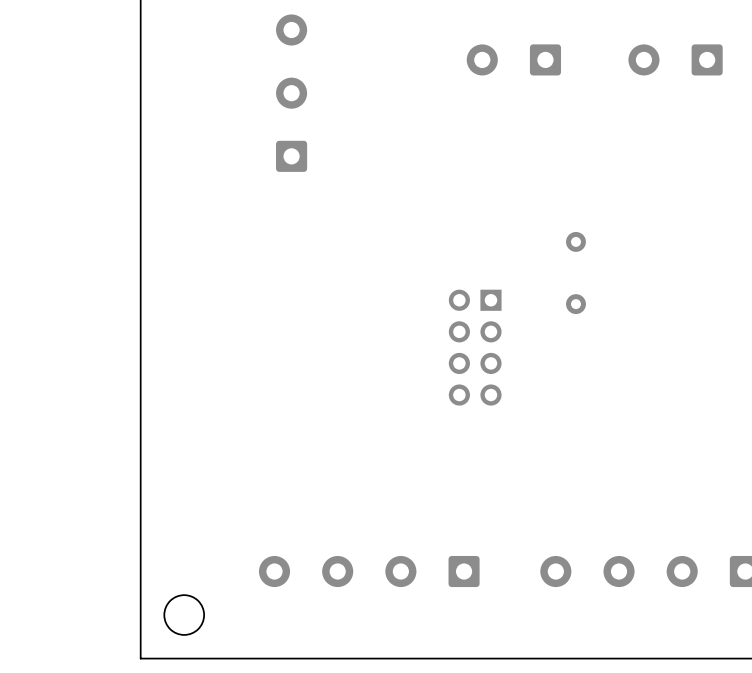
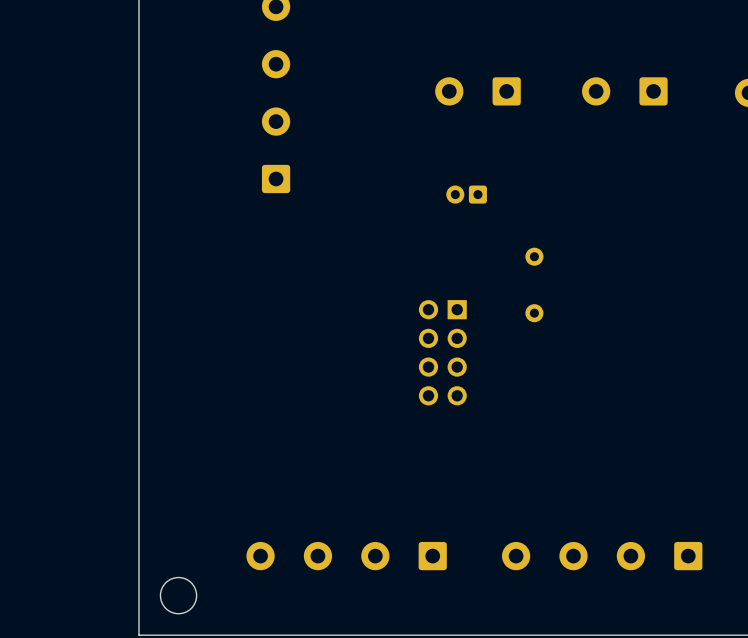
part: none -> (466, 194)

